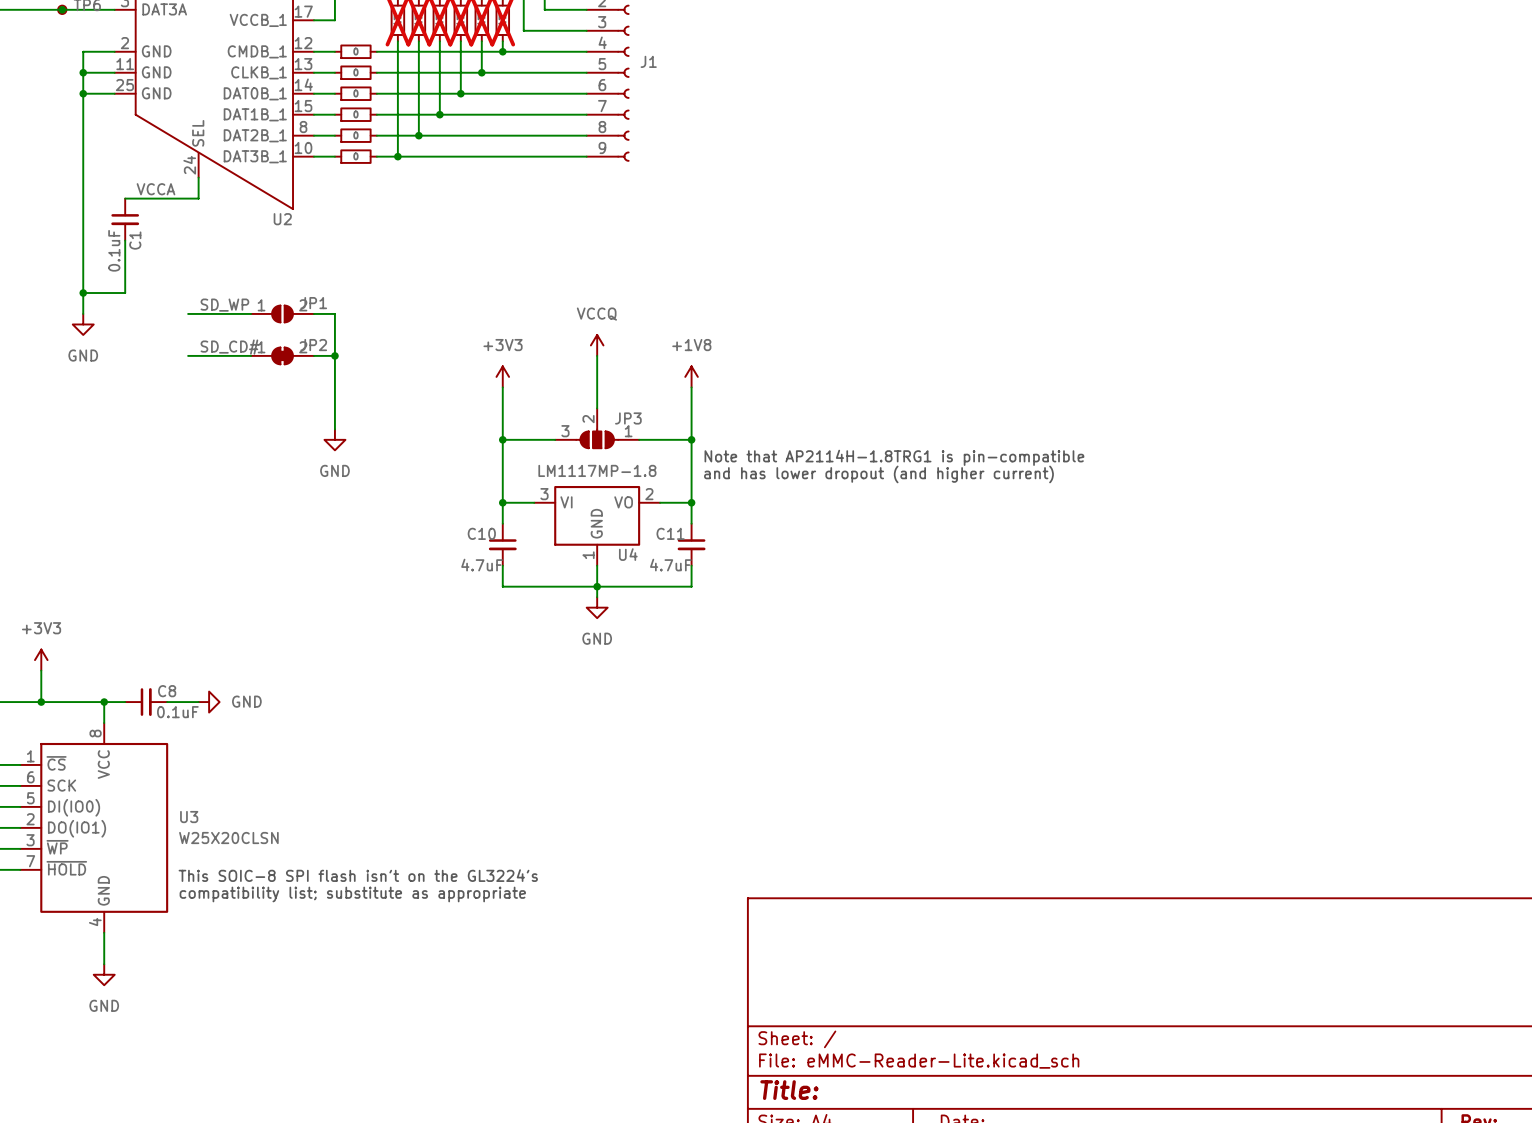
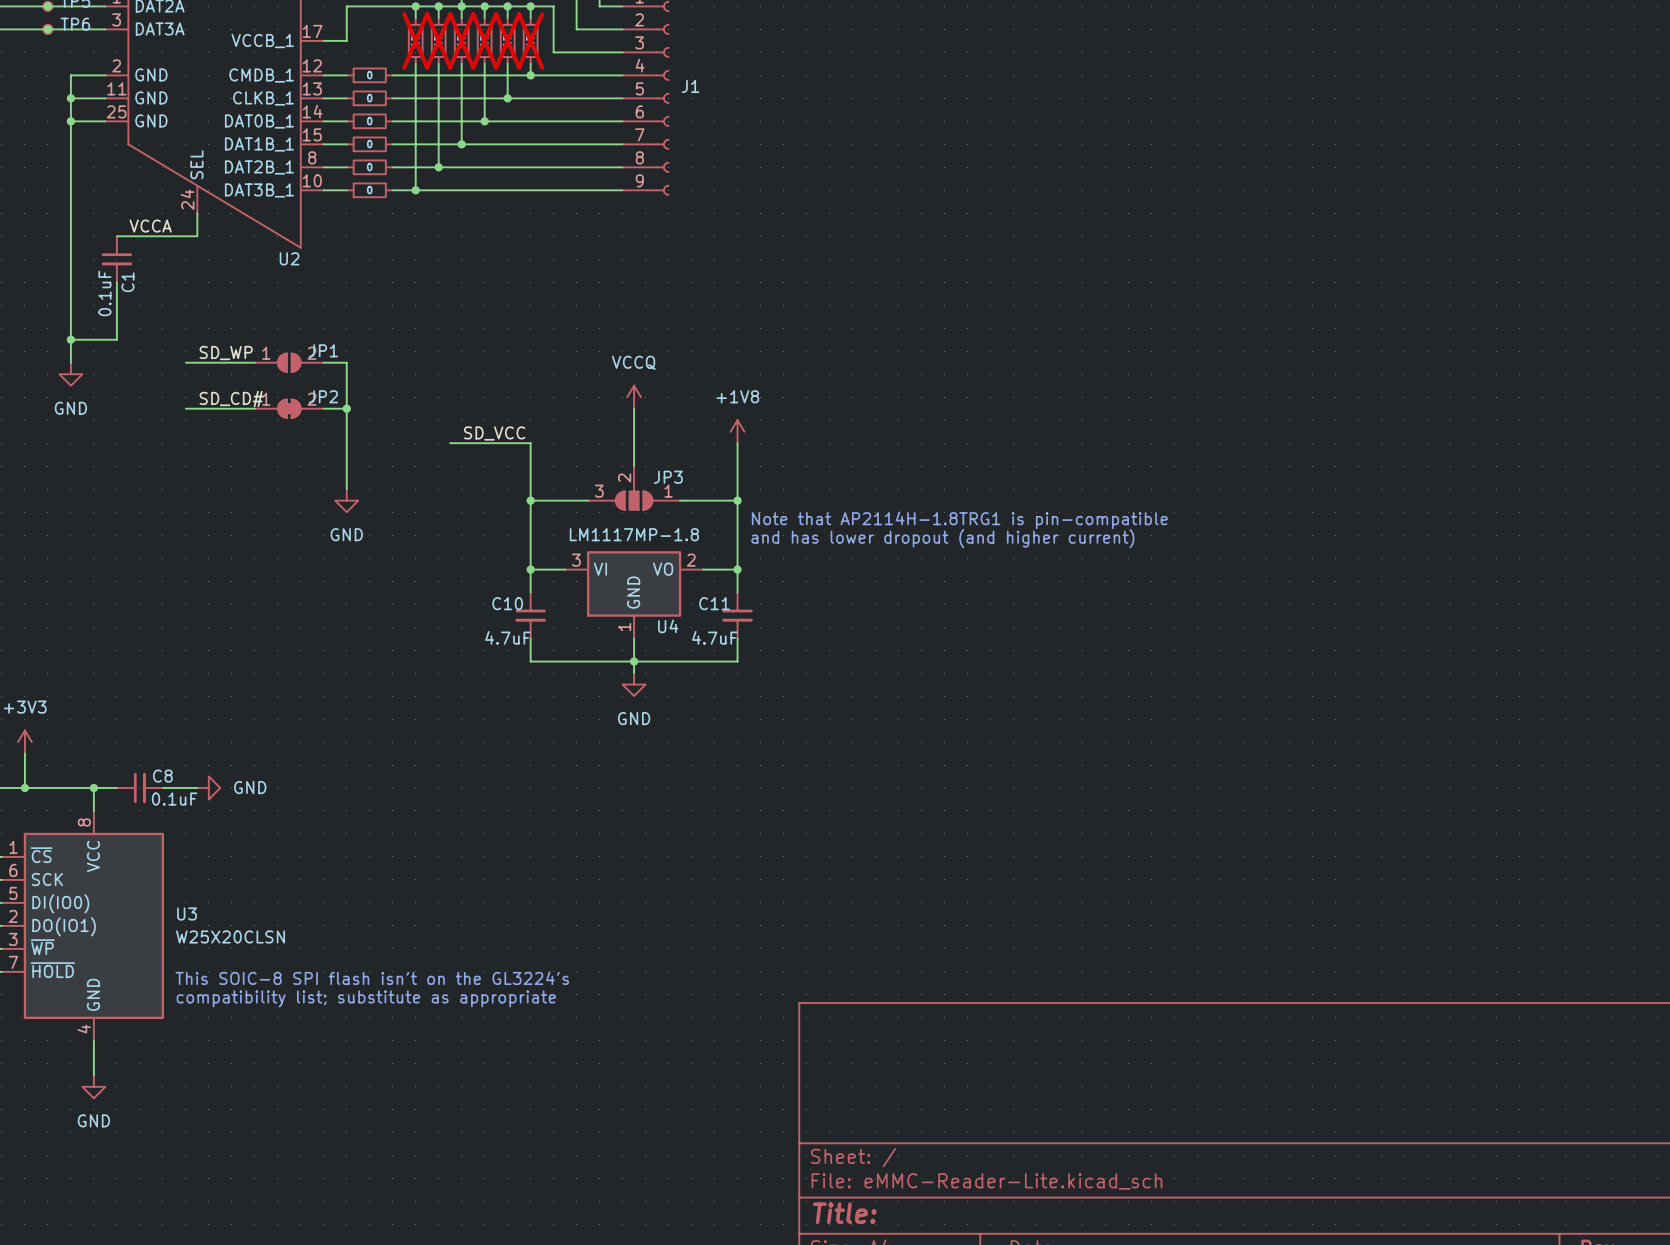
power symbol: +3V3 (502, 376) -> none
label: none -> SD_VCC (494, 433)
wire: none -> (450, 443) (530, 443)

